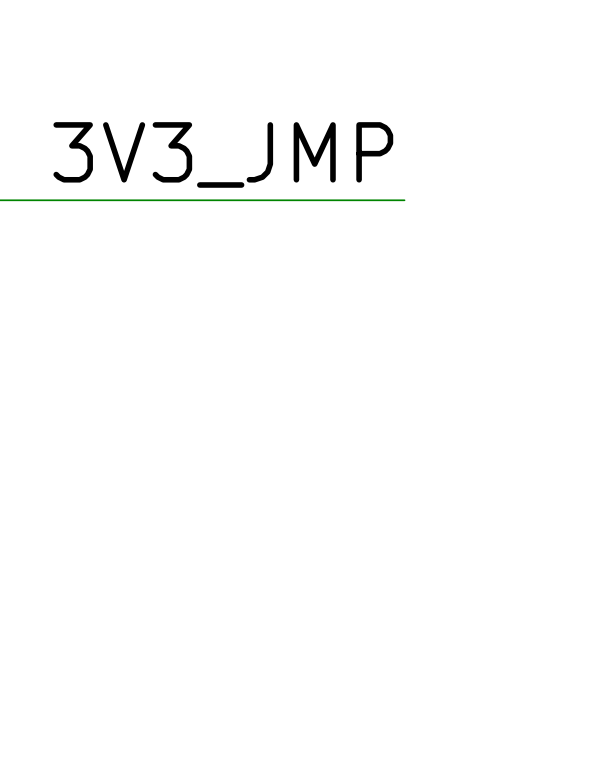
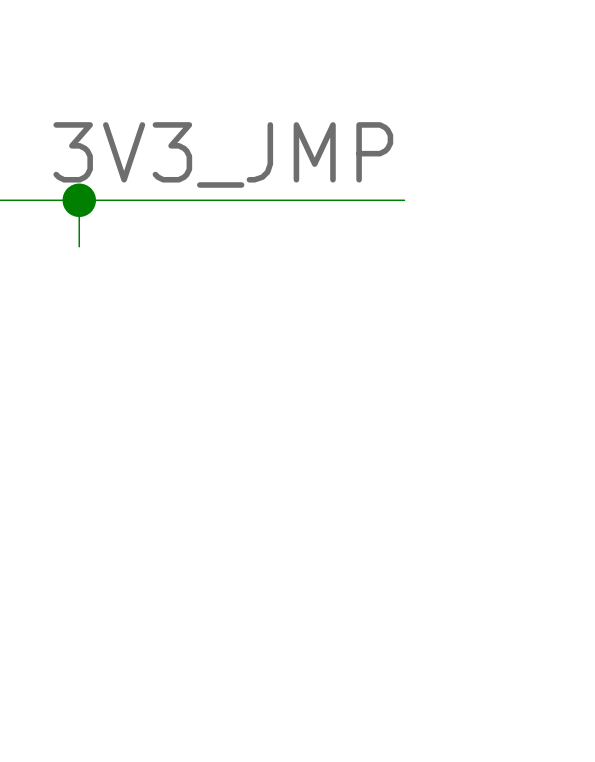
wire: none -> (79, 200) (79, 246)
junction: none -> (79, 200)

